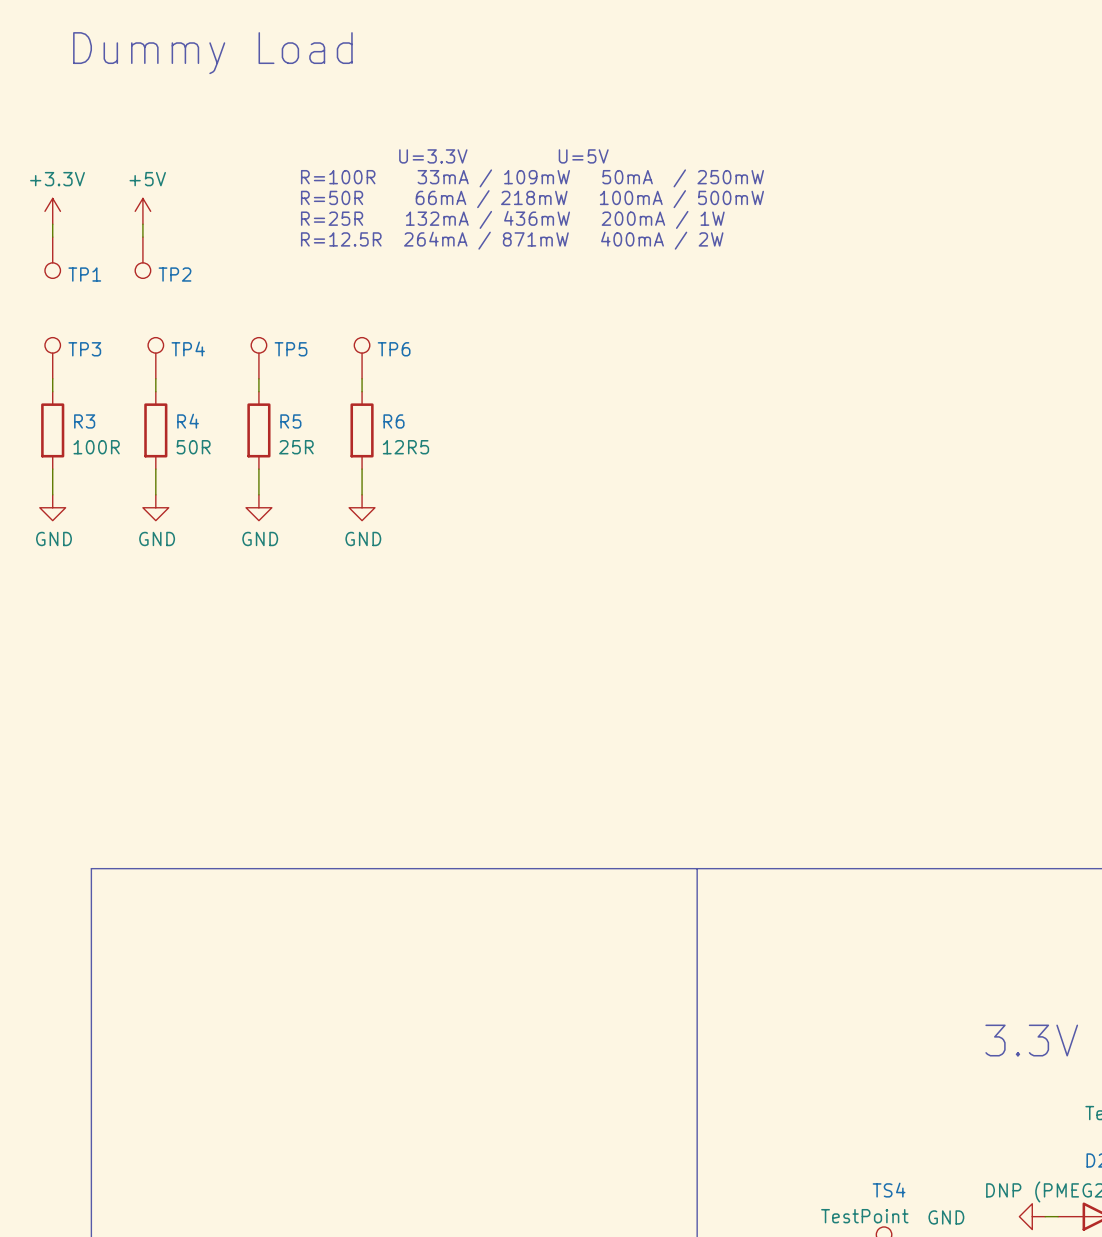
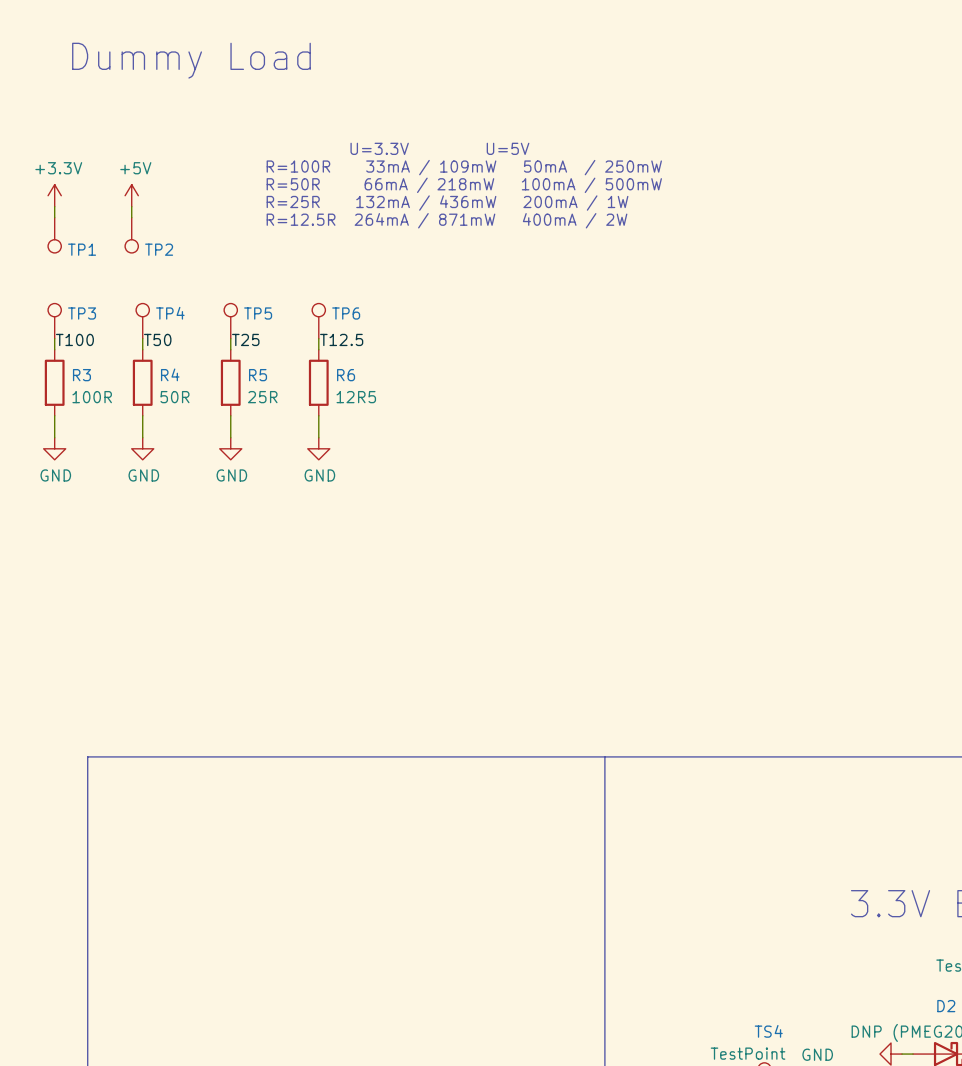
label: none -> T100 (74, 339)
label: none -> T50 (157, 339)
label: none -> T25 (245, 339)
label: none -> T12.5 (341, 339)

